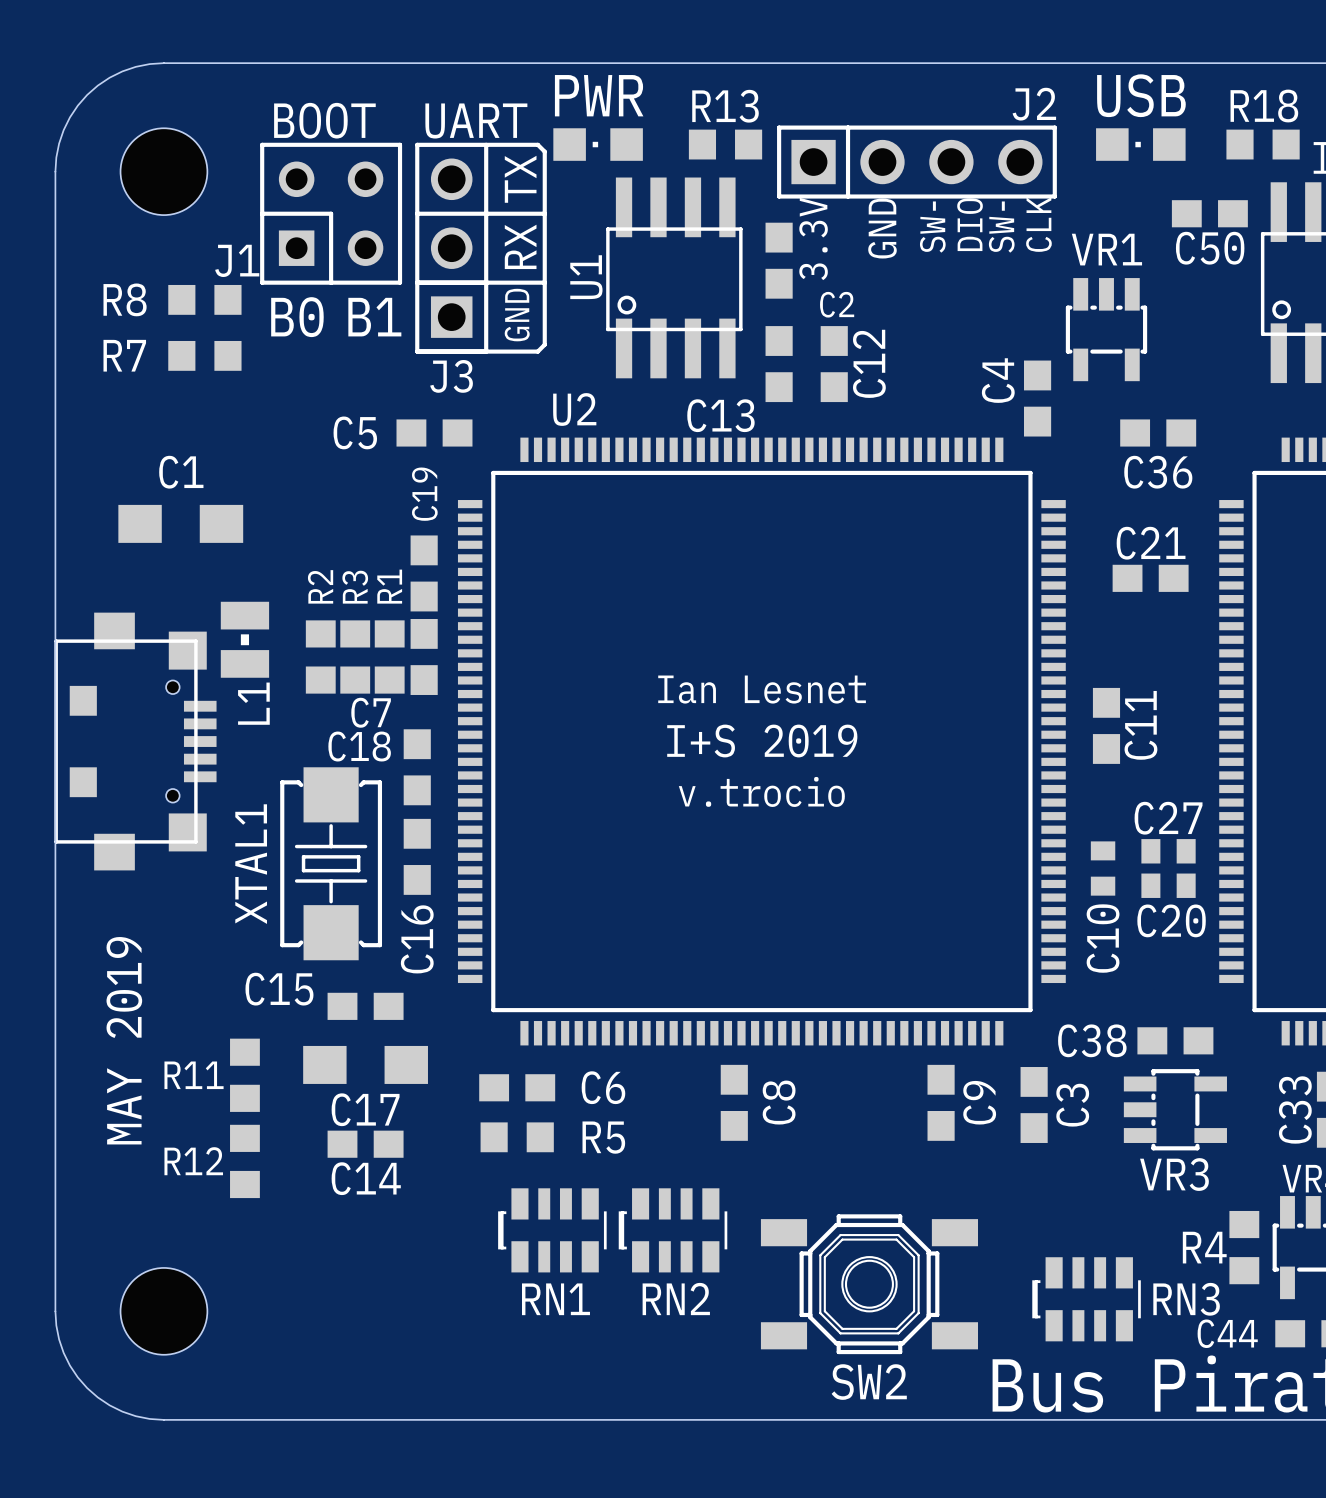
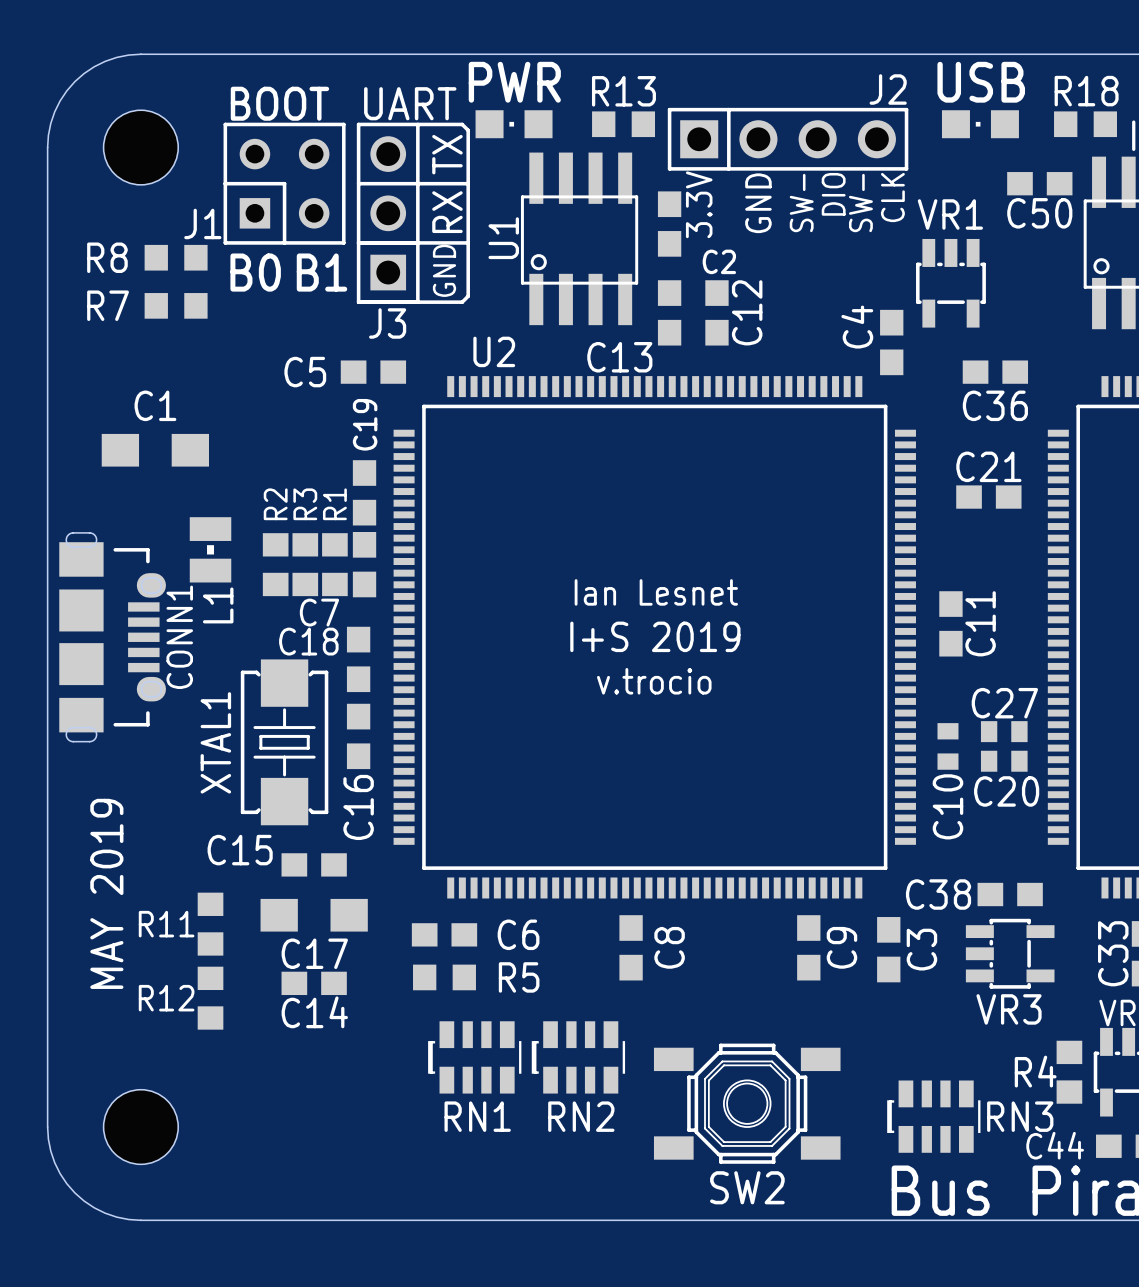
CONN1: none -> (112, 637)
part: (135, 741) -> none

